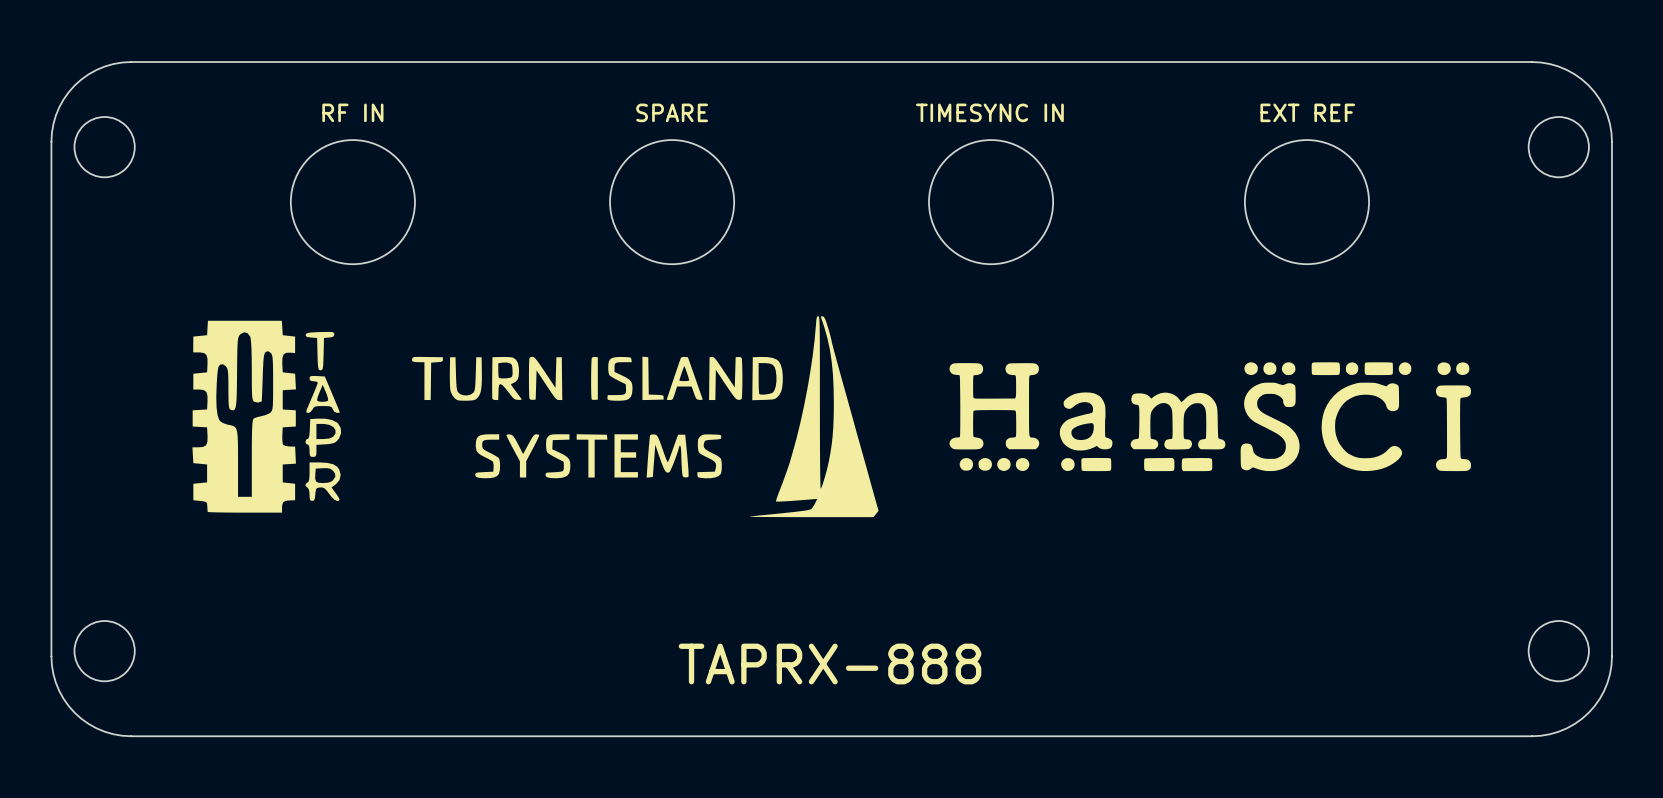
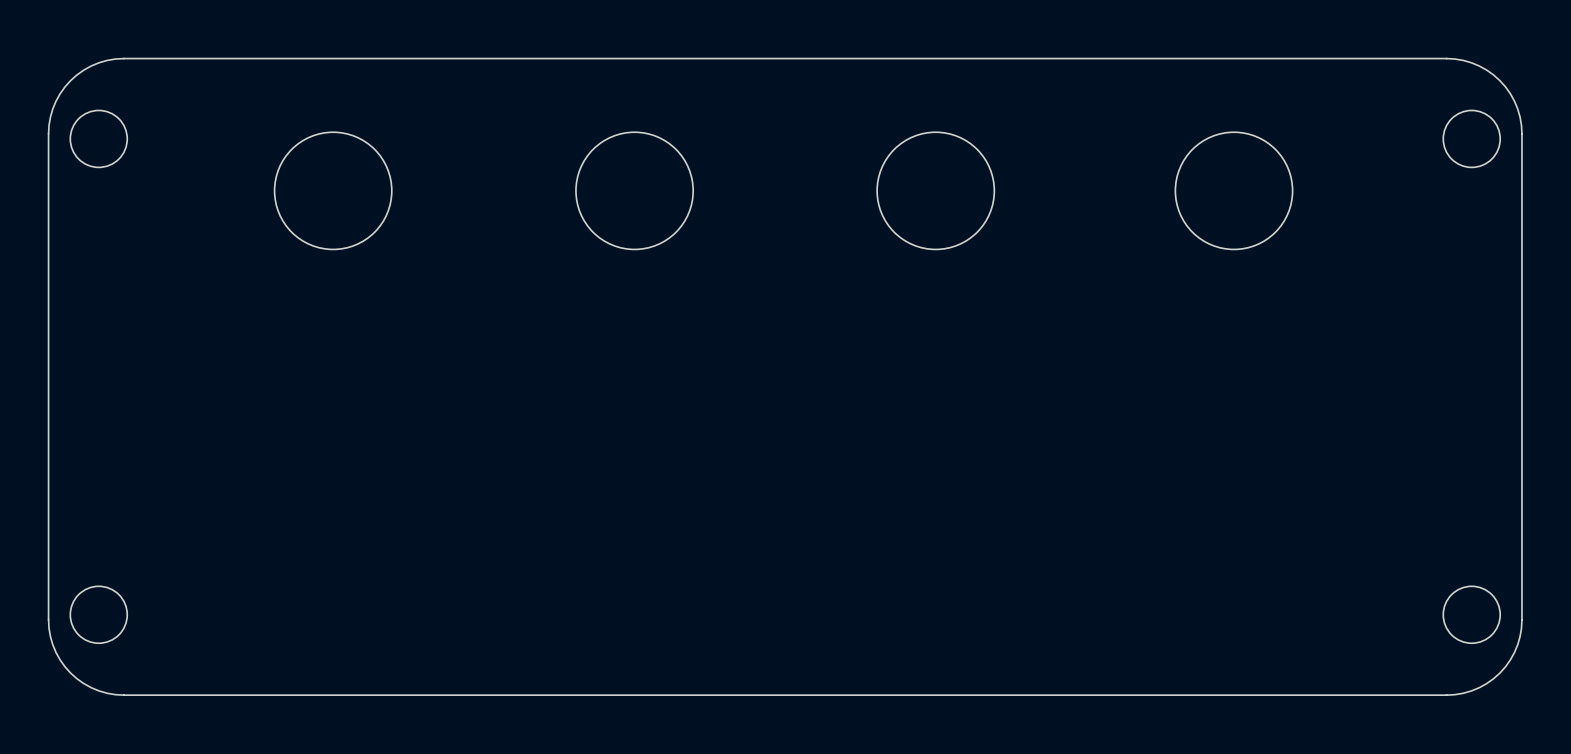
text: RF IN (352, 112) -> none
text: SPARE (672, 112) -> none
text: TIMESYNC IN (989, 112) -> none
text: EXT REF (1307, 112) -> none
drawing: [591, 316, 879, 518] -> none
drawing: [192, 320, 342, 513] -> none
drawing: [412, 356, 563, 401] -> none
drawing: [949, 362, 1412, 472] -> none
drawing: [1435, 362, 1471, 472] -> none
drawing: [475, 434, 722, 479] -> none
text: TAPRX-888 (830, 664) -> none

